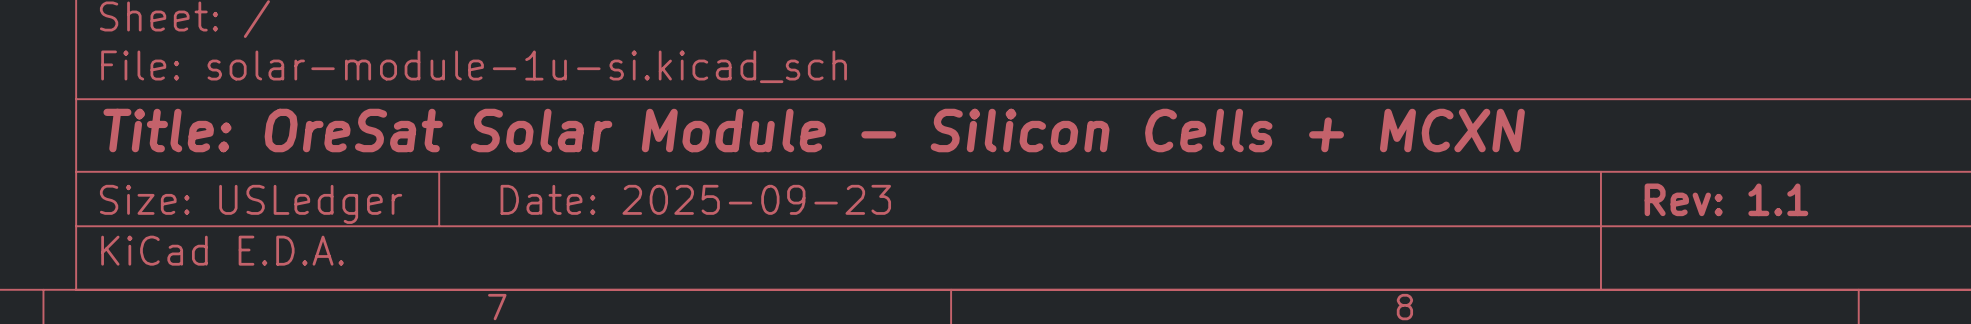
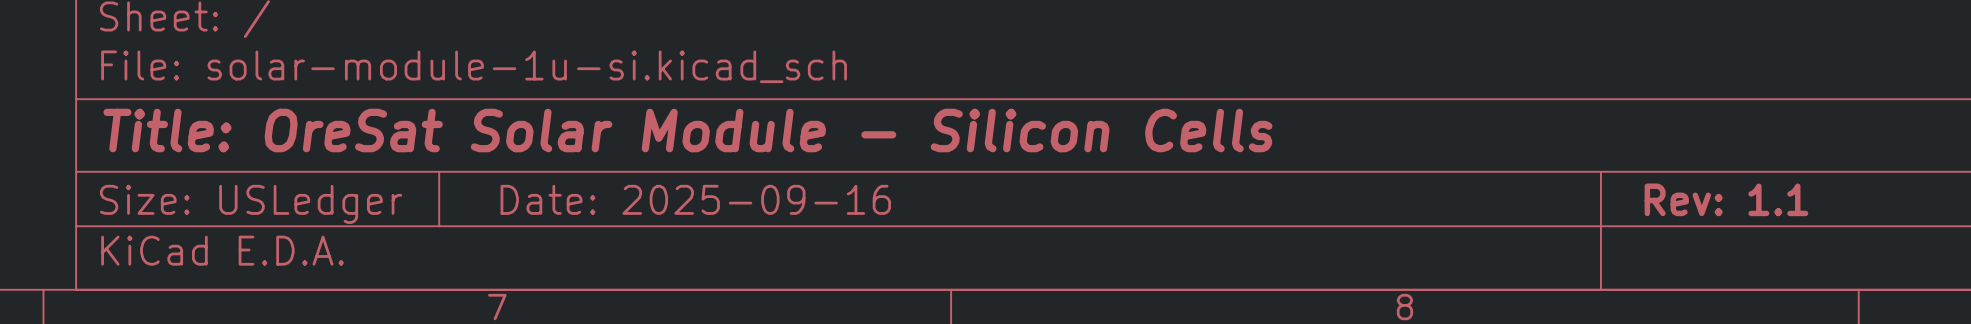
title block: Title: OreSat Solar Module - Silicon Cells + MCXN (814, 130) -> Title: OreSat Solar Module - Silicon Cells (687, 130)
title block: Date: 2025-09-23 (695, 199) -> Date: 2025-09-16 (695, 199)

